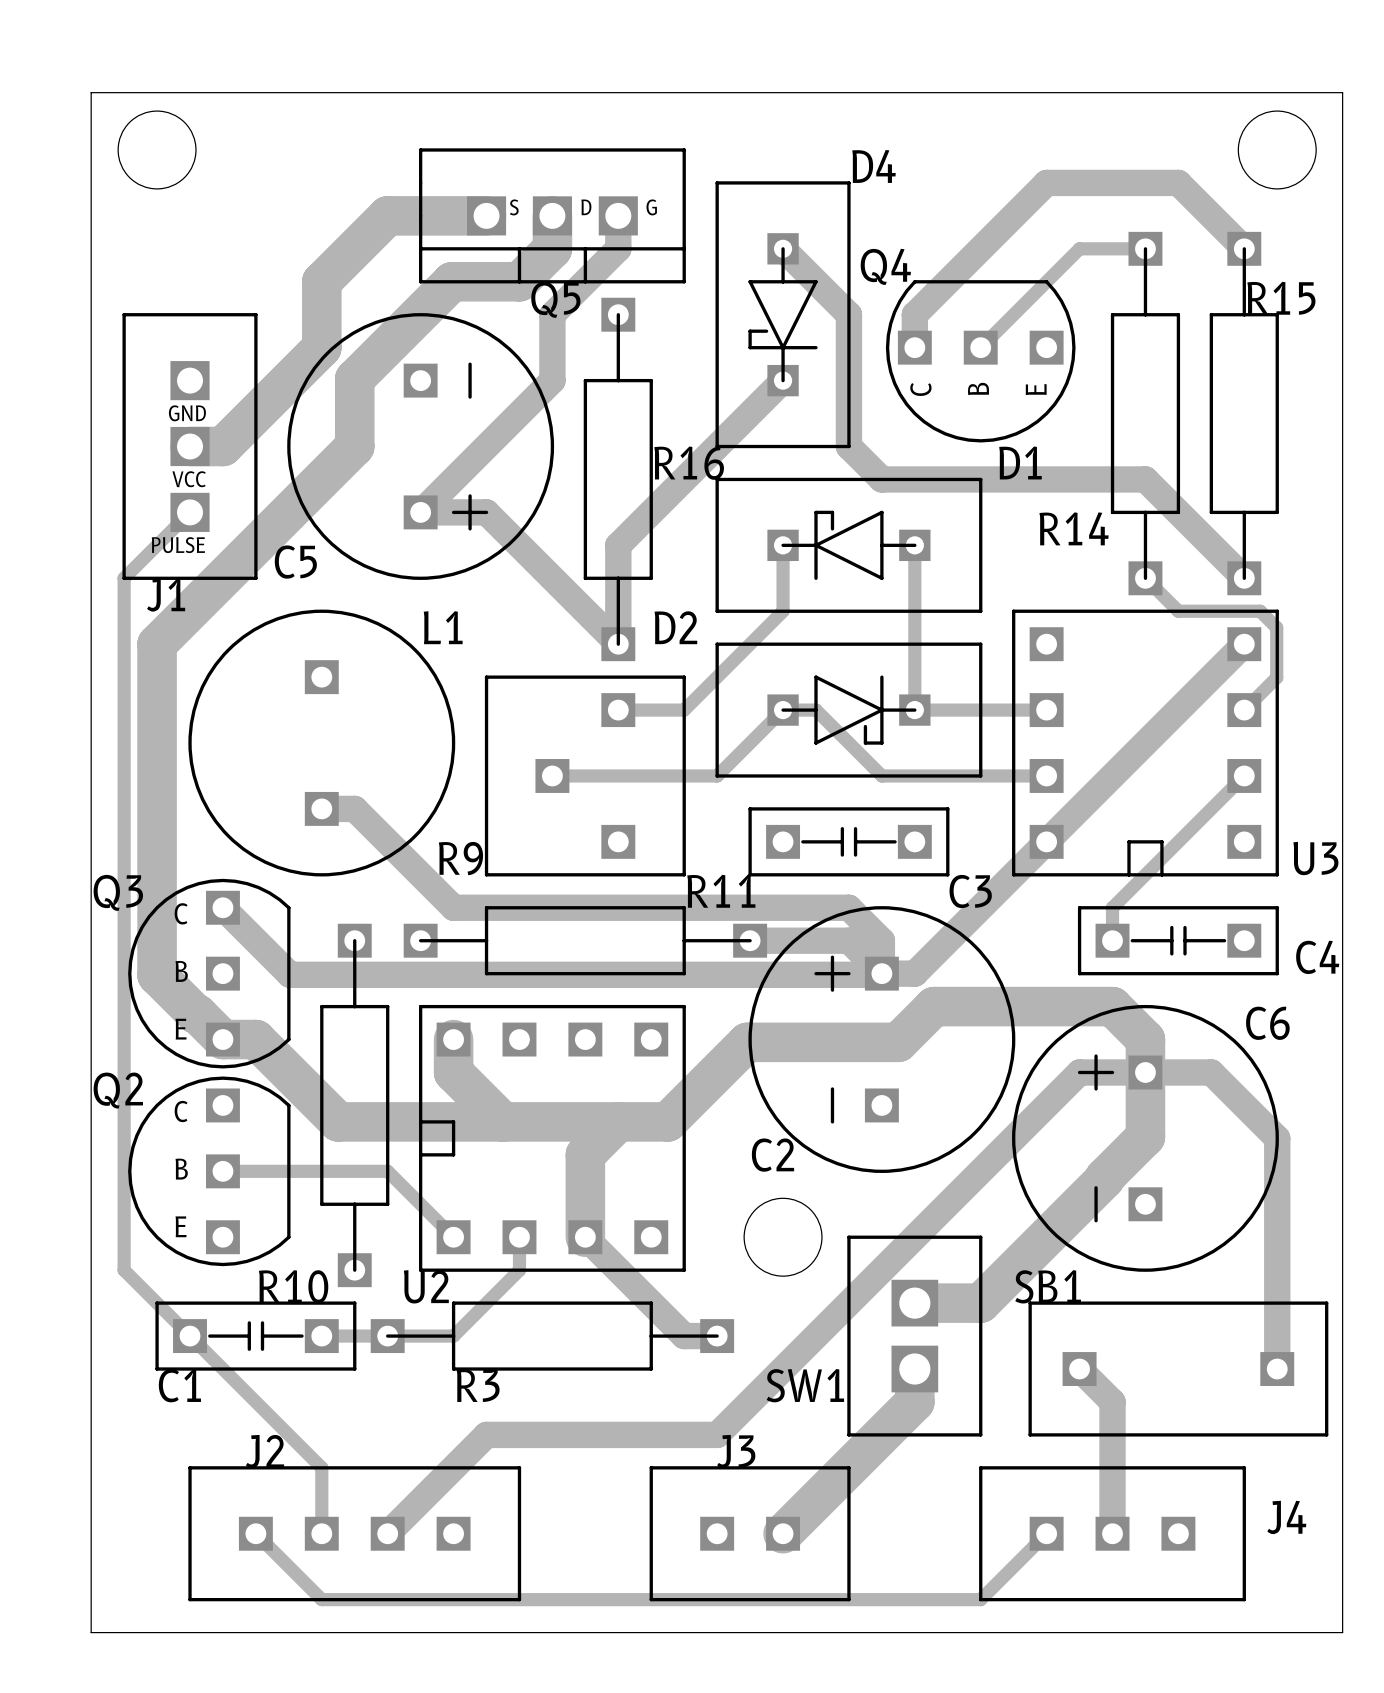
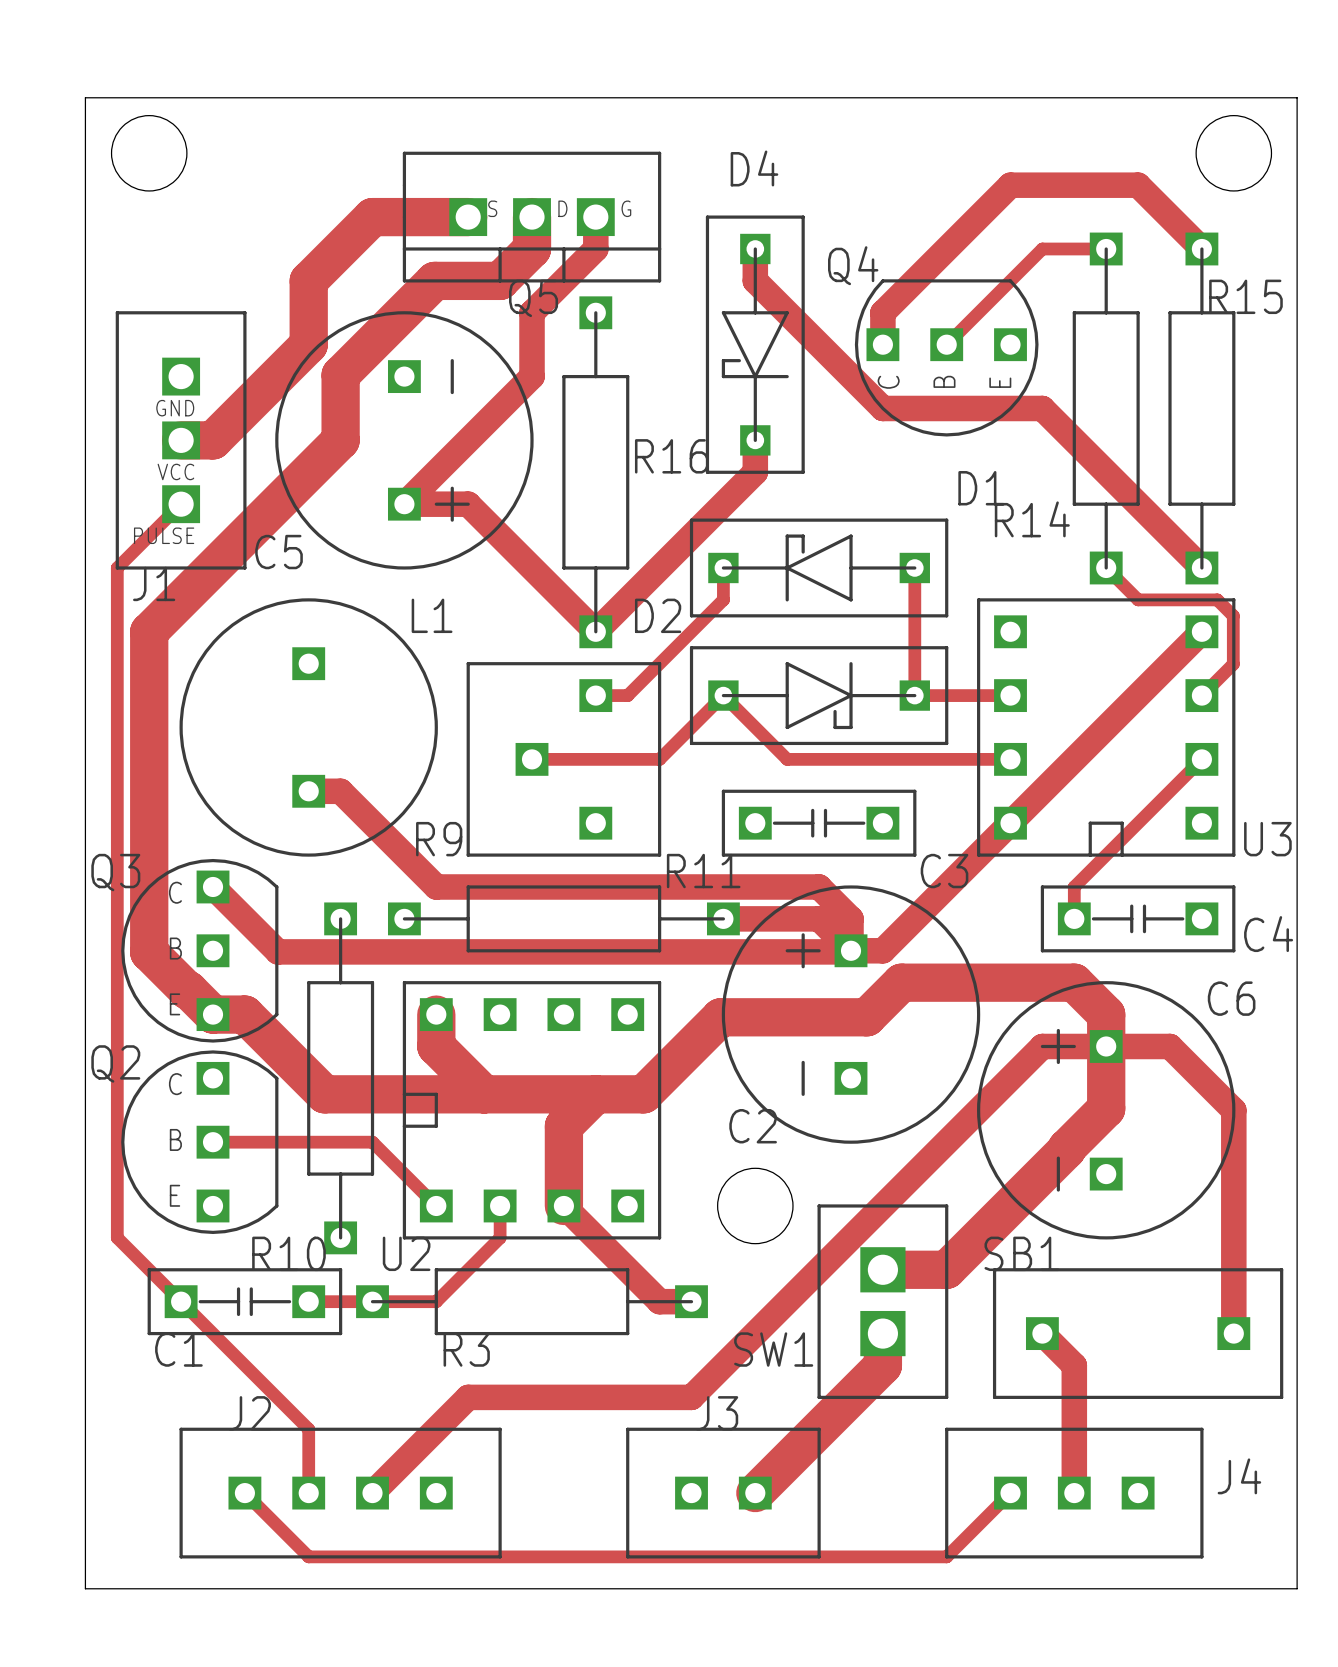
D4 name position: D4 (874, 166) -> D4 (754, 168)
D4 footprint: [715, 181, 851, 449] -> [705, 215, 805, 474]
track: (783, 248) (848, 314) (848, 446) (881, 479) (1145, 479) -> (755, 248) (755, 280) (882, 408) (1042, 408) (1106, 472)
track: (783, 380) (618, 545) (618, 644) -> (755, 440) (755, 472) (595, 631)
D1 footprint: [715, 477, 983, 613] -> [689, 518, 949, 618]
track: (783, 545) (783, 611) (684, 710) (651, 710) -> (723, 567) (723, 599) (627, 695)
track: (914, 545) (914, 710) (947, 710) -> (914, 567) (914, 695)
D2 footprint: [715, 642, 983, 778] -> [689, 646, 949, 746]
track: (684, 775) (717, 775) (783, 710) (816, 710) (881, 775) -> (659, 759) (723, 695) (787, 759) (851, 759)

